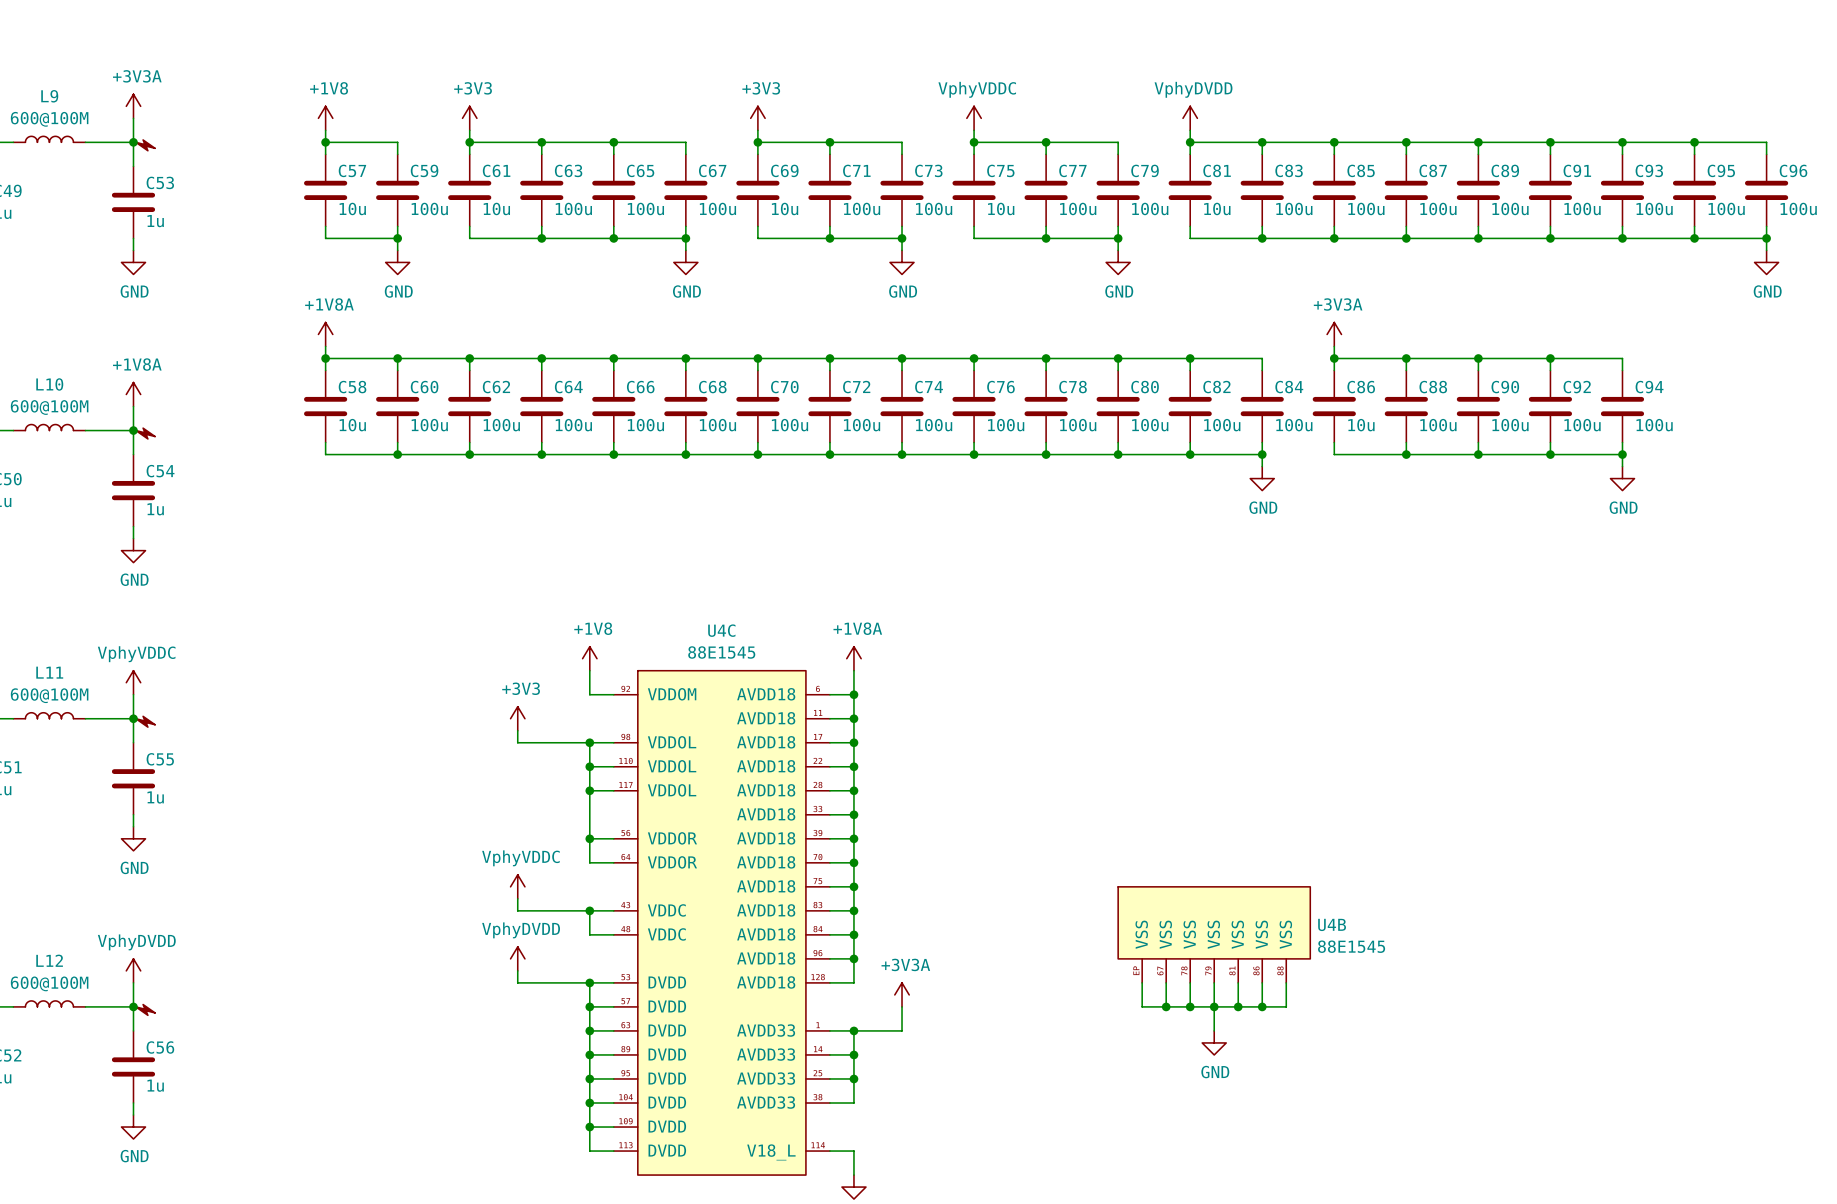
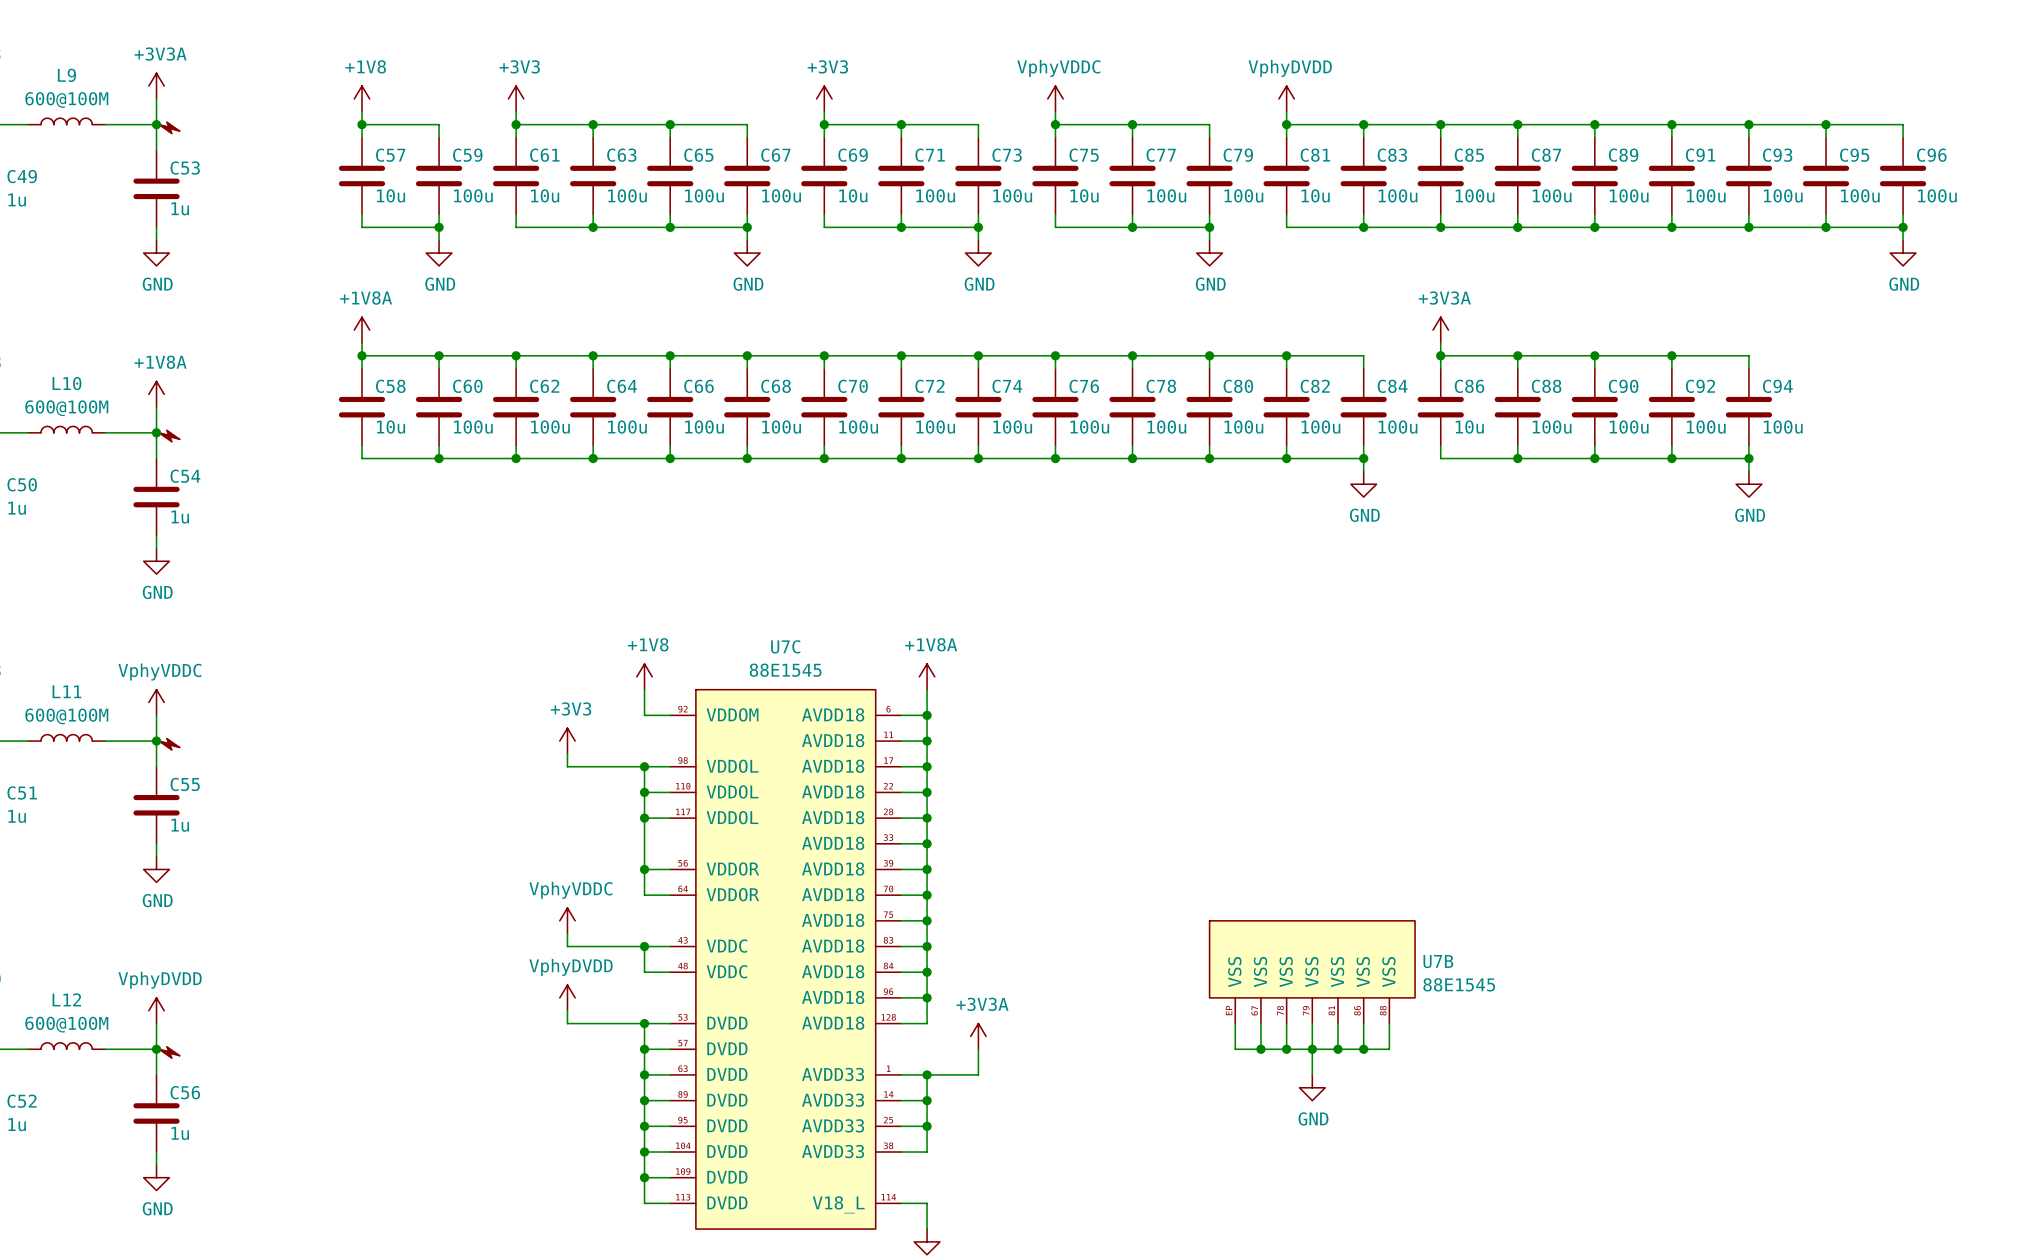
U4C name: U4C (721, 630) -> U7C (785, 646)
U4B name: U4B (1332, 924) -> U7B (1438, 961)

